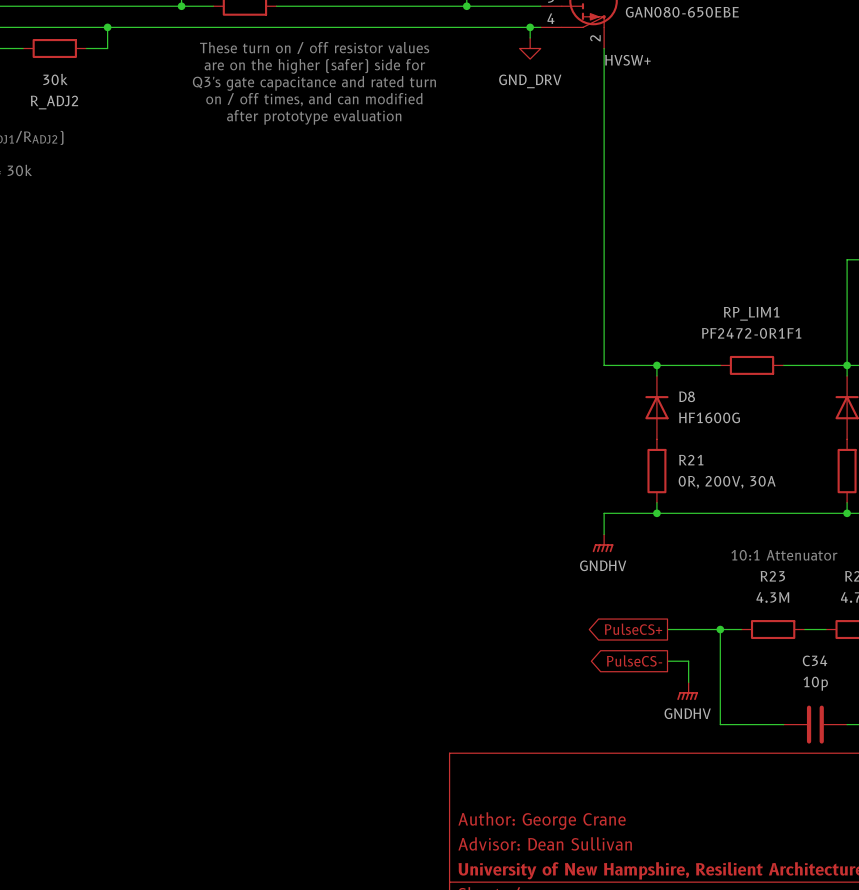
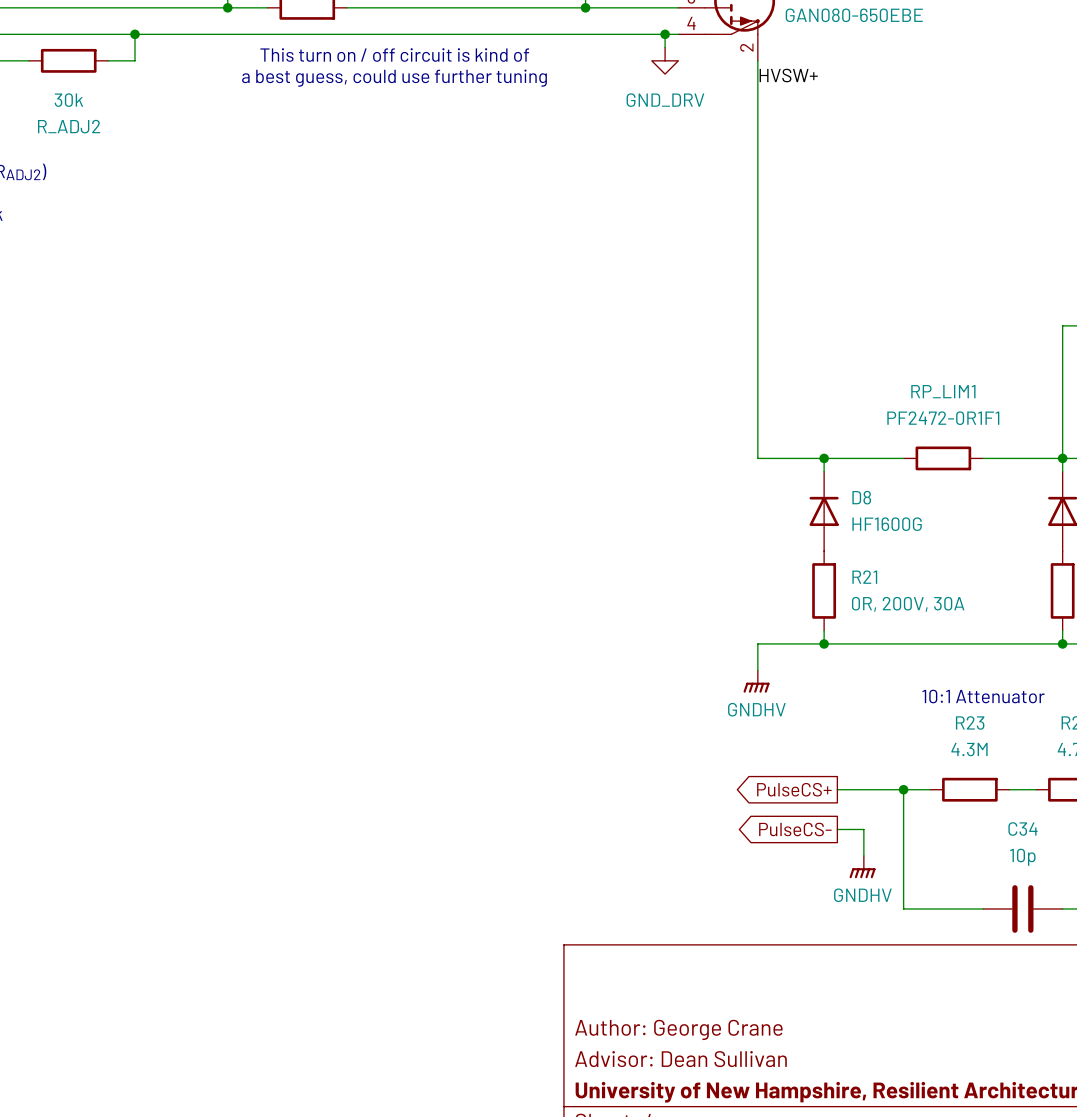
text: These turn on / off resistor values (314, 47) -> This turn on / off circuit is kind of (394, 55)
text: are on the higher (safer) side for (314, 66) -> a best guess, could use further tuning (394, 78)
text: Q3's gate capacitance and rated turn (314, 83) -> none
text: on / off times, and can modified (314, 99) -> none
text: after prototype evaluation (314, 117) -> none

